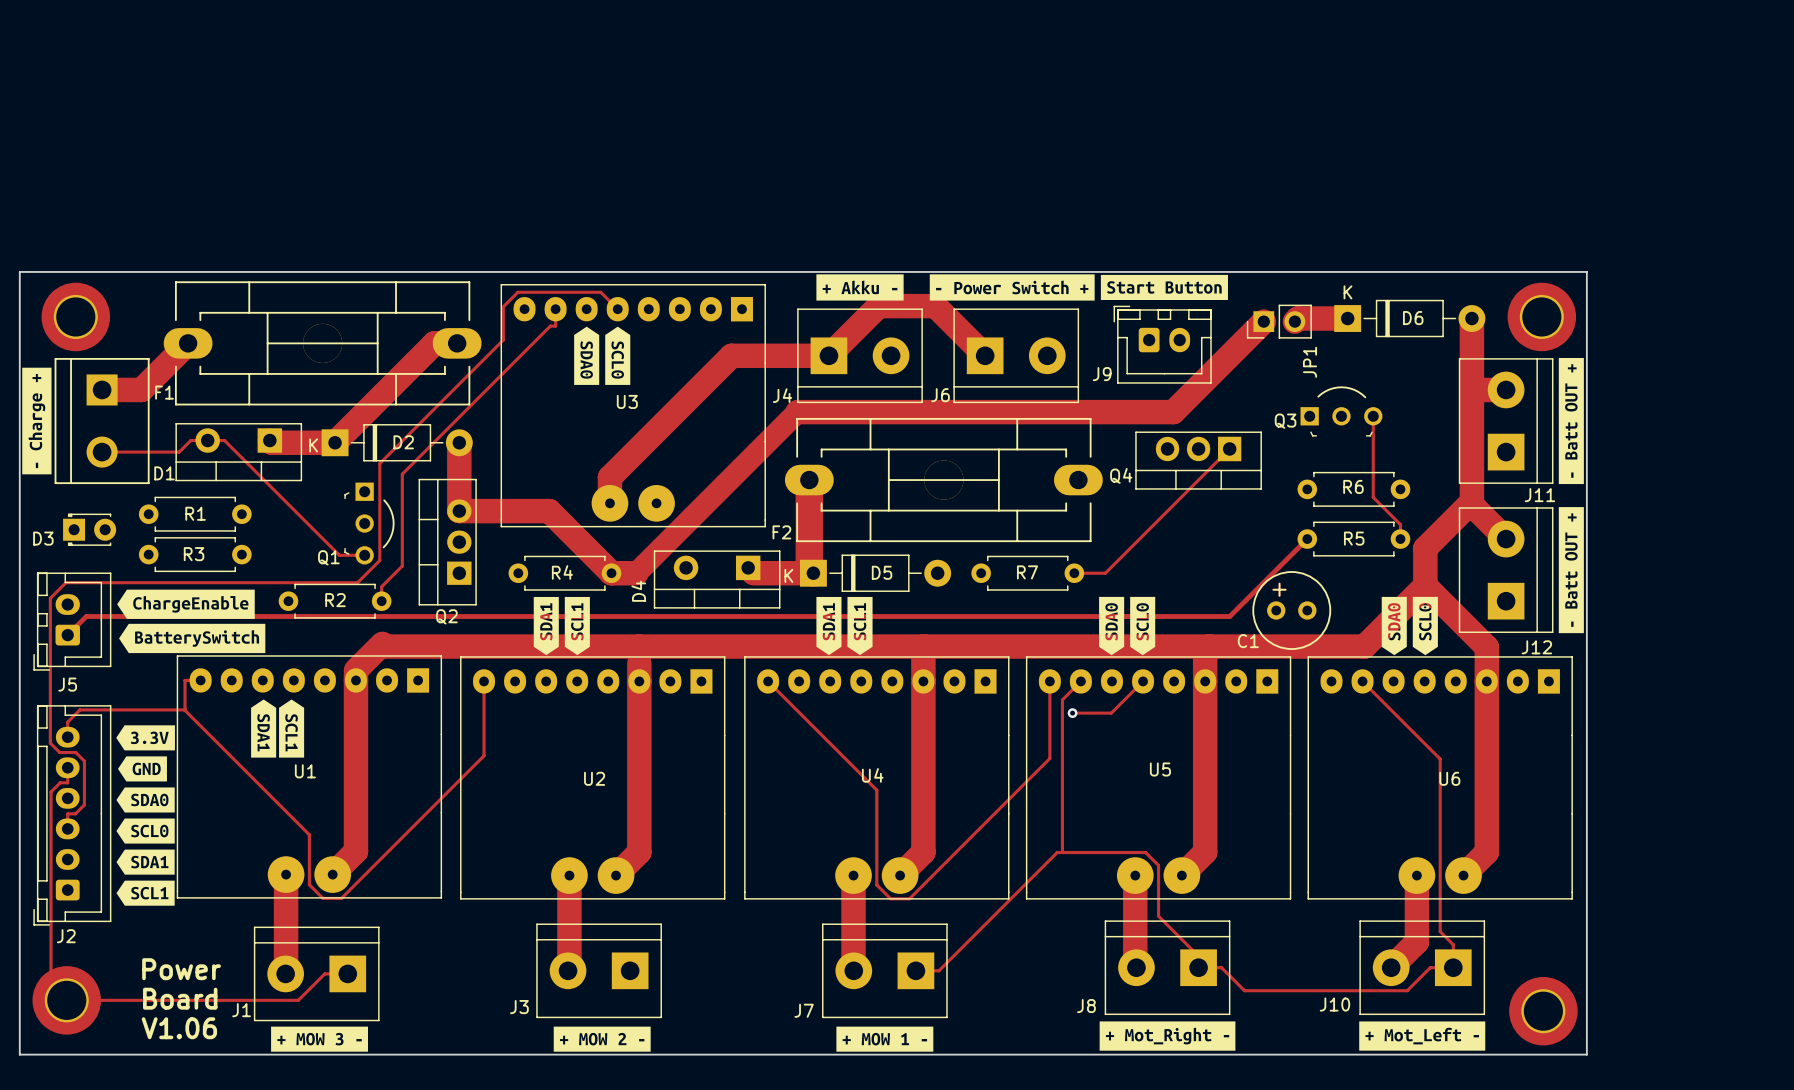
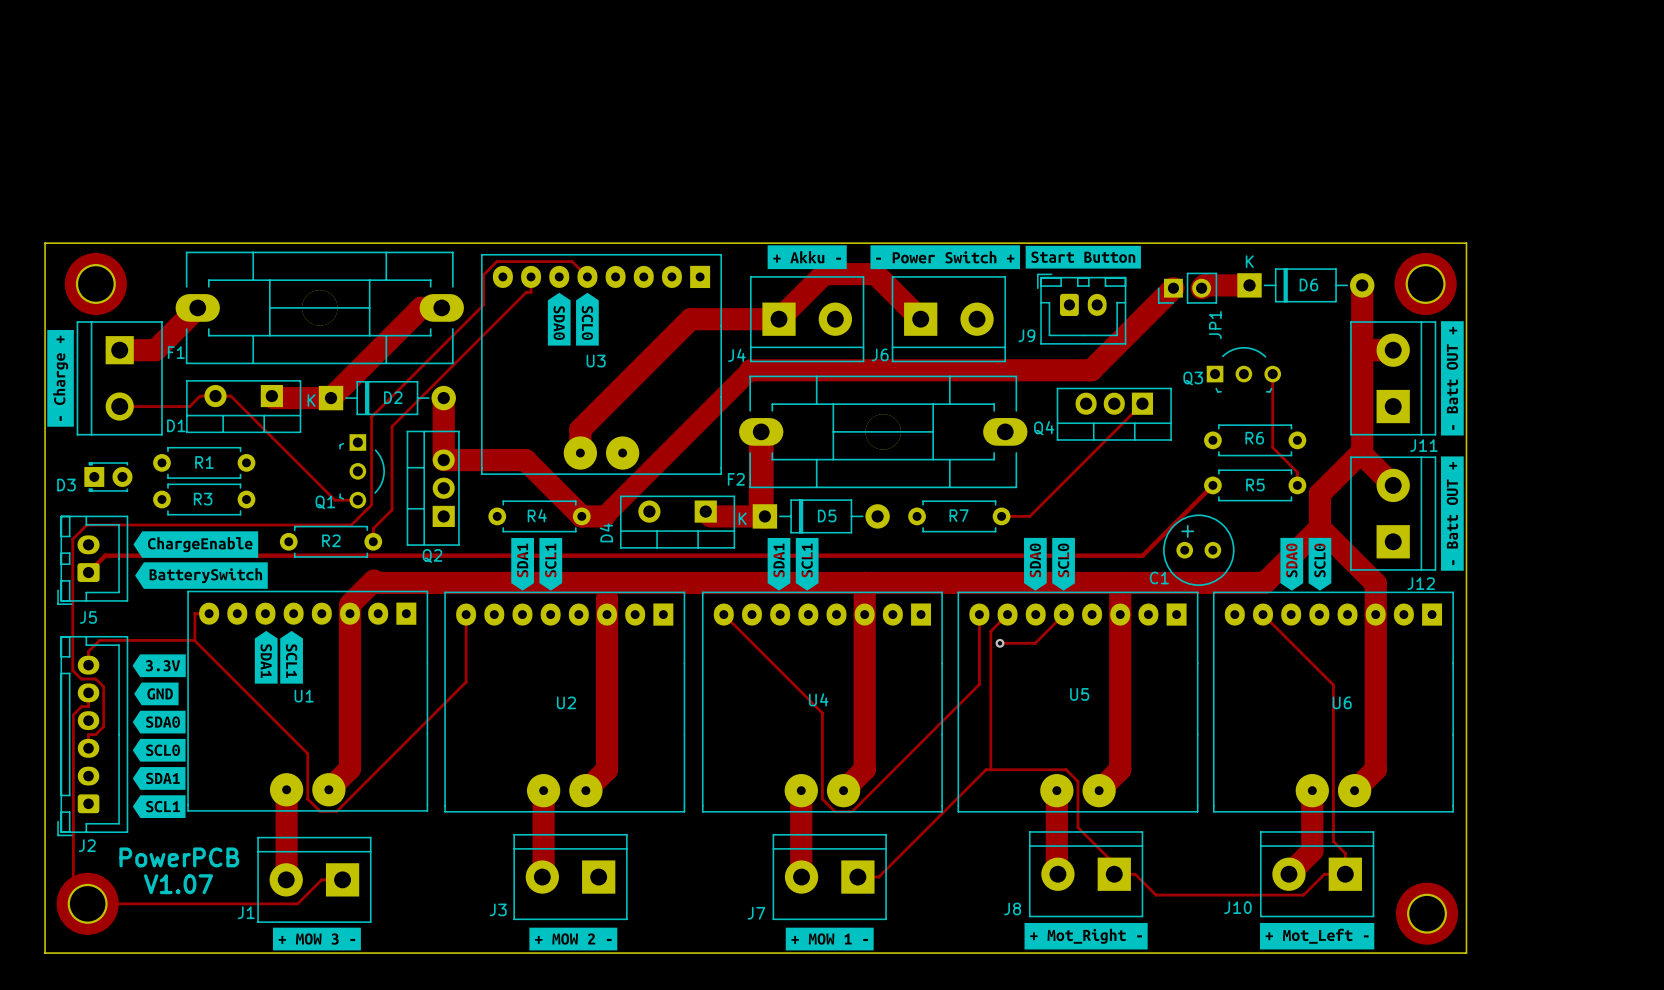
text: Power (181, 969) -> PowerPCB (179, 857)
text: none -> V1.07 (178, 884)
text: Board (180, 998) -> none
text: V1.06 (179, 1028) -> none

